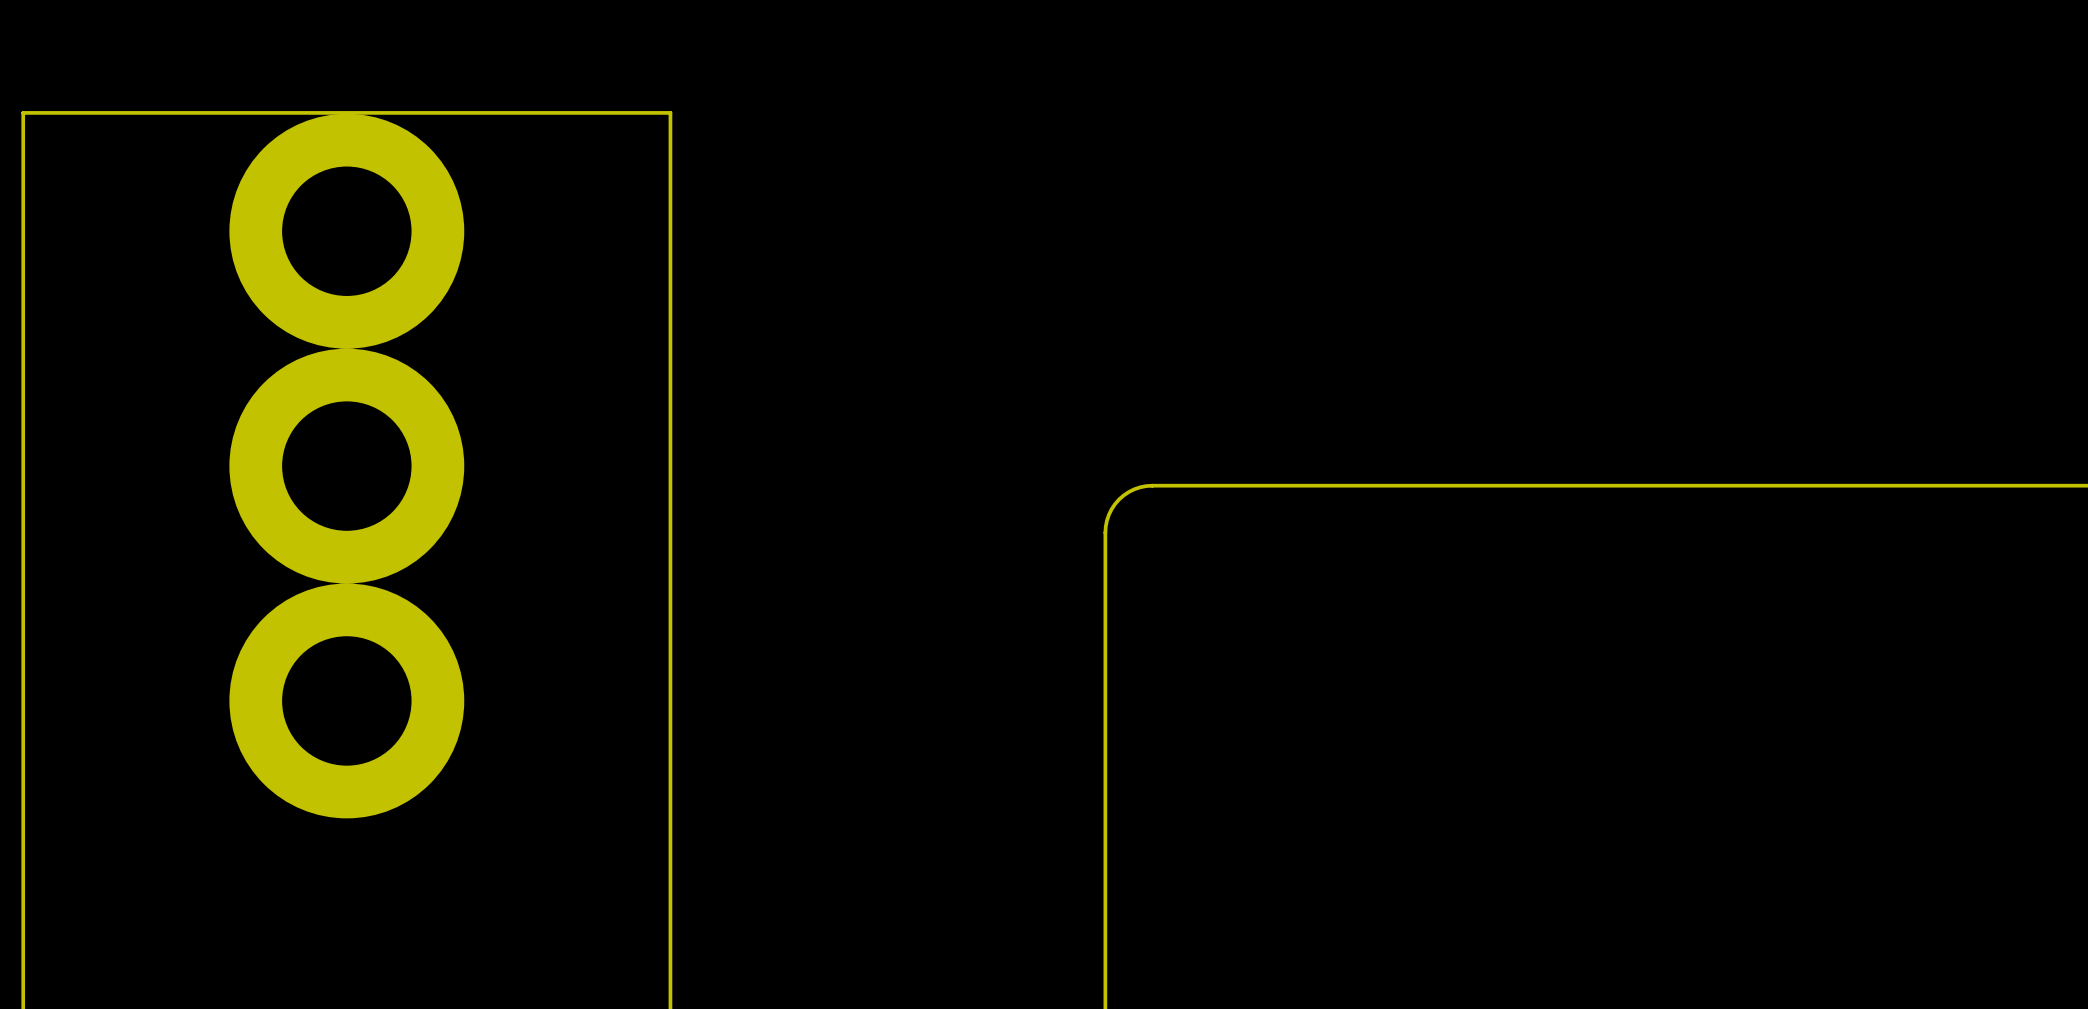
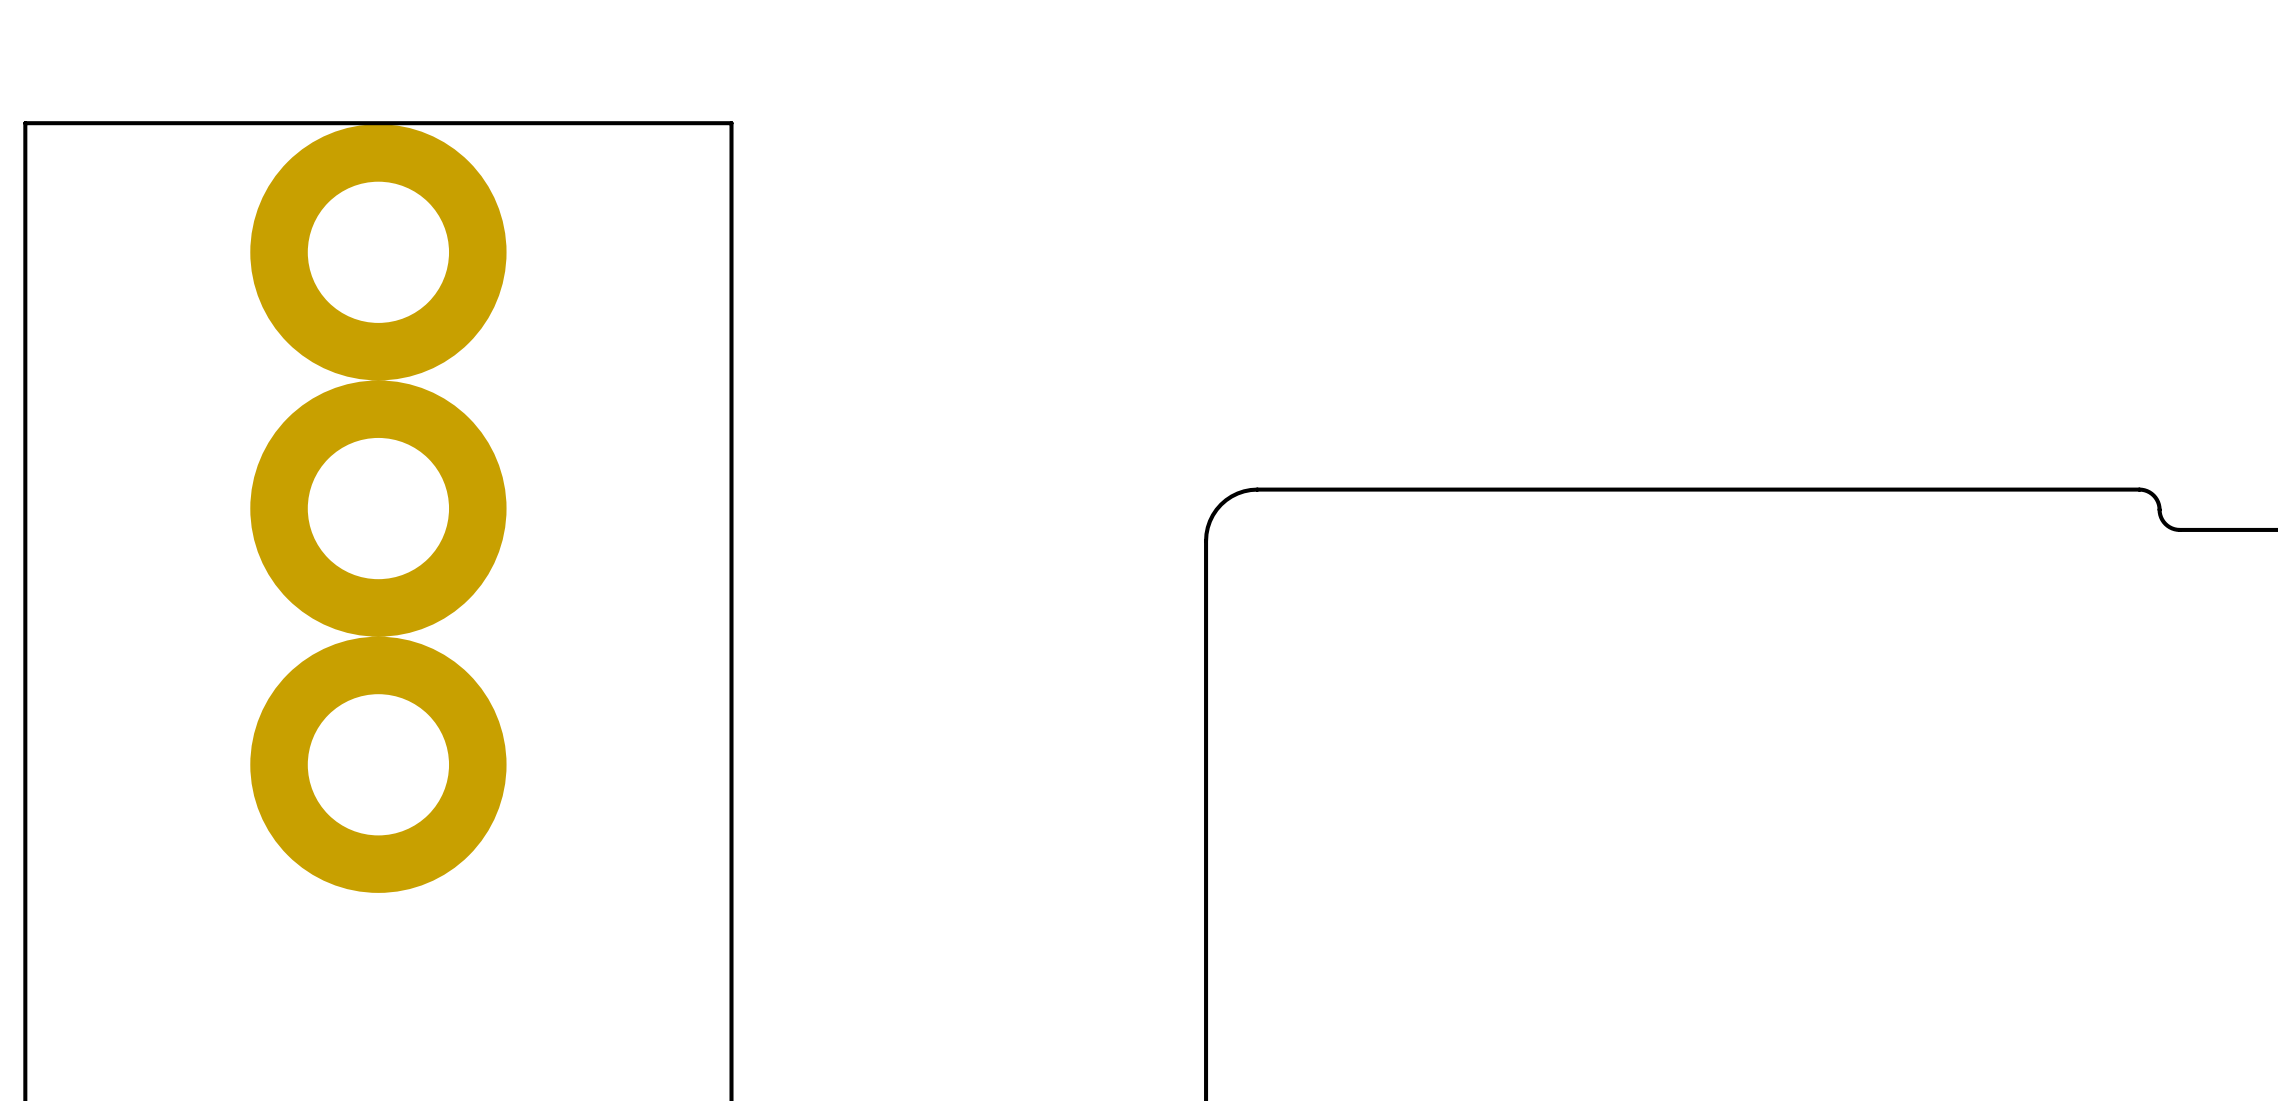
board edge: (1997, 485) (1152, 485) (1134, 489) (1119, 499) (1108, 514) (1105, 532) -> (2179, 529) (2172, 528) (2165, 524) (2161, 517) (2155, 497) (2147, 491) (2139, 489) (1257, 489) (1244, 491) (1231, 496) (1221, 504) (1212, 515) (1206, 534) (1206, 581)

